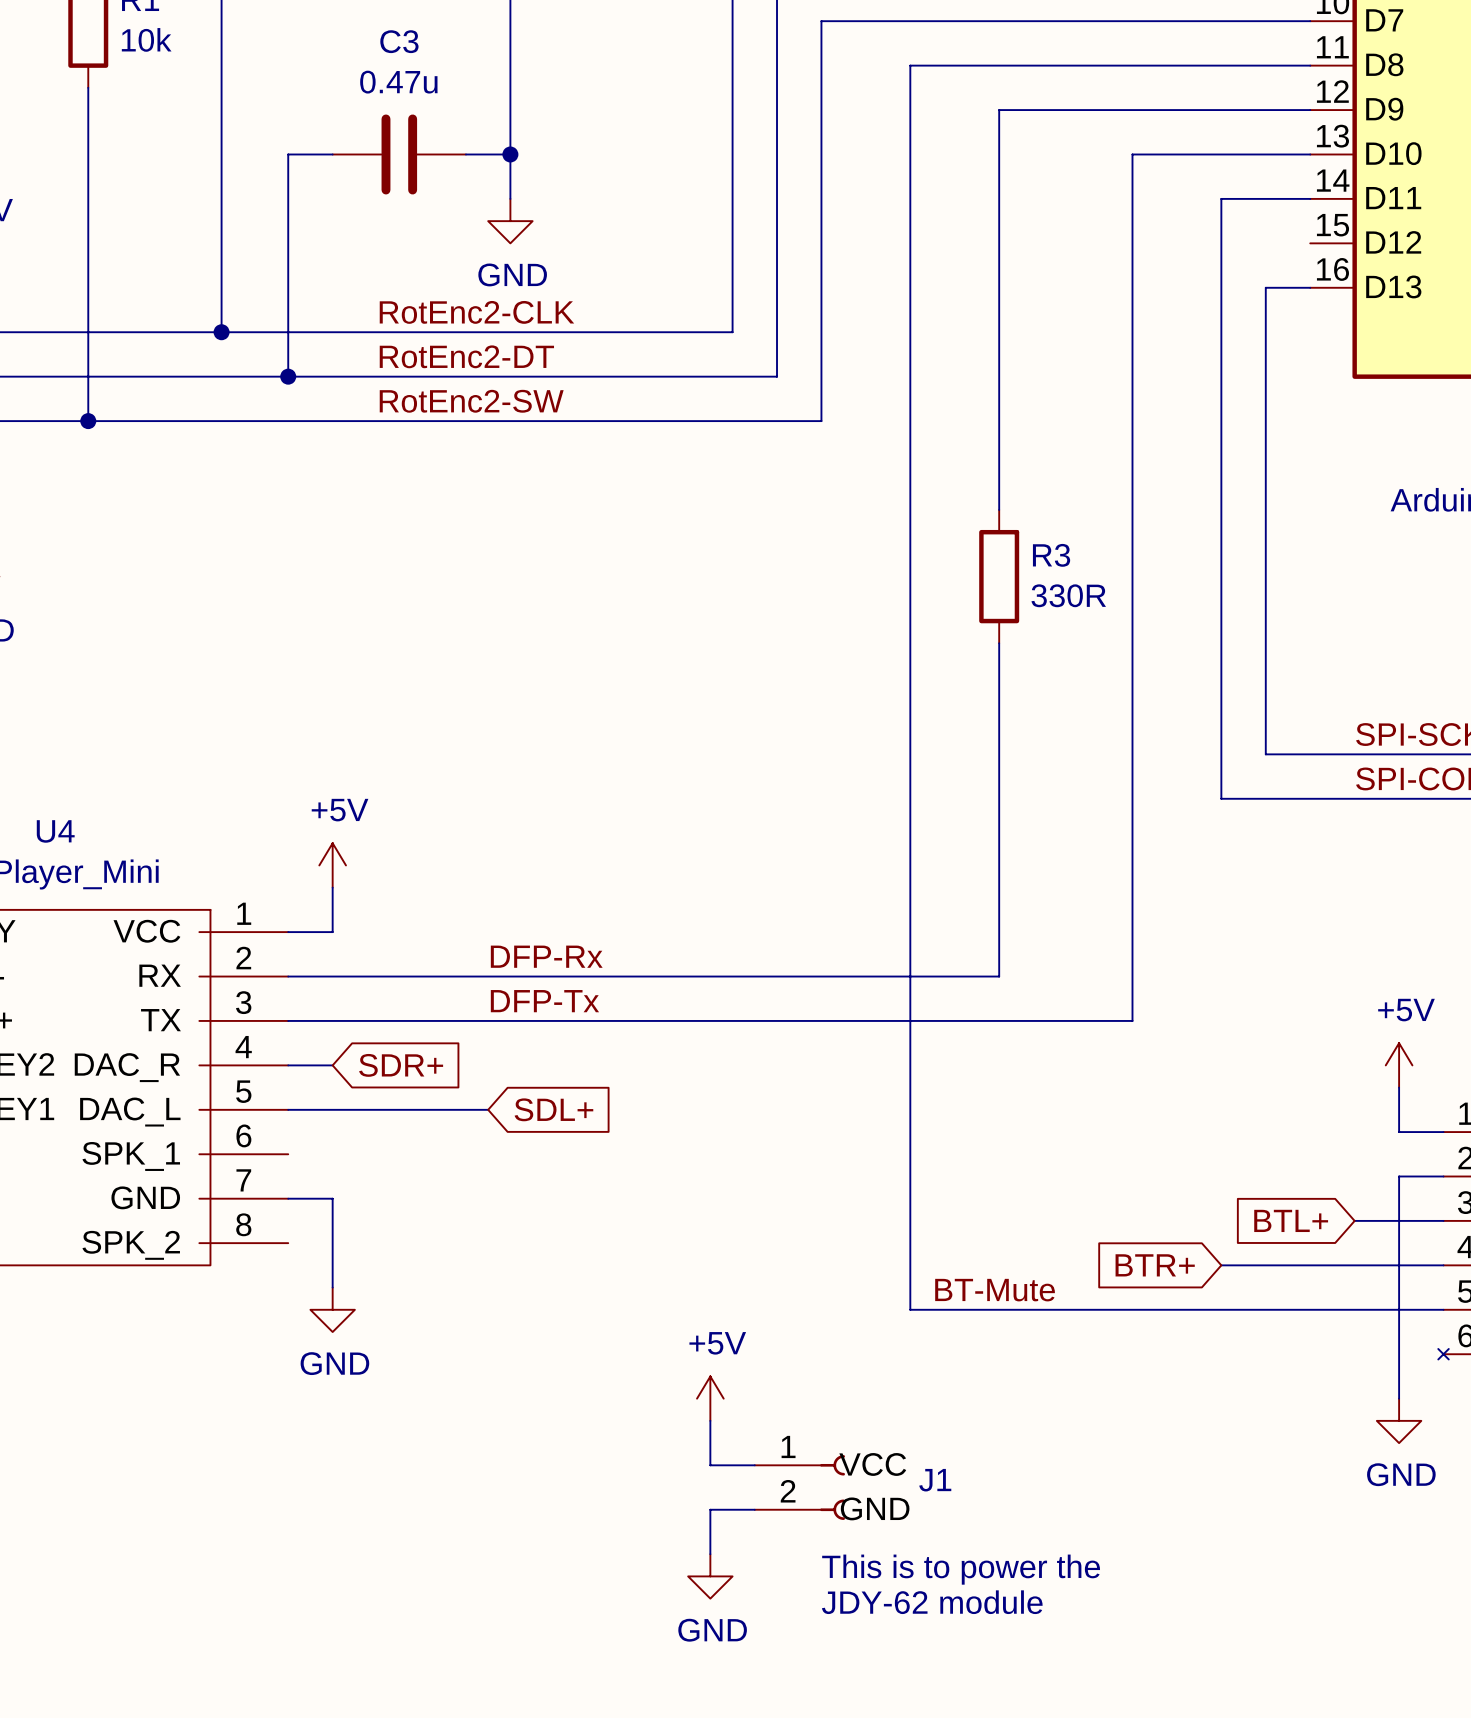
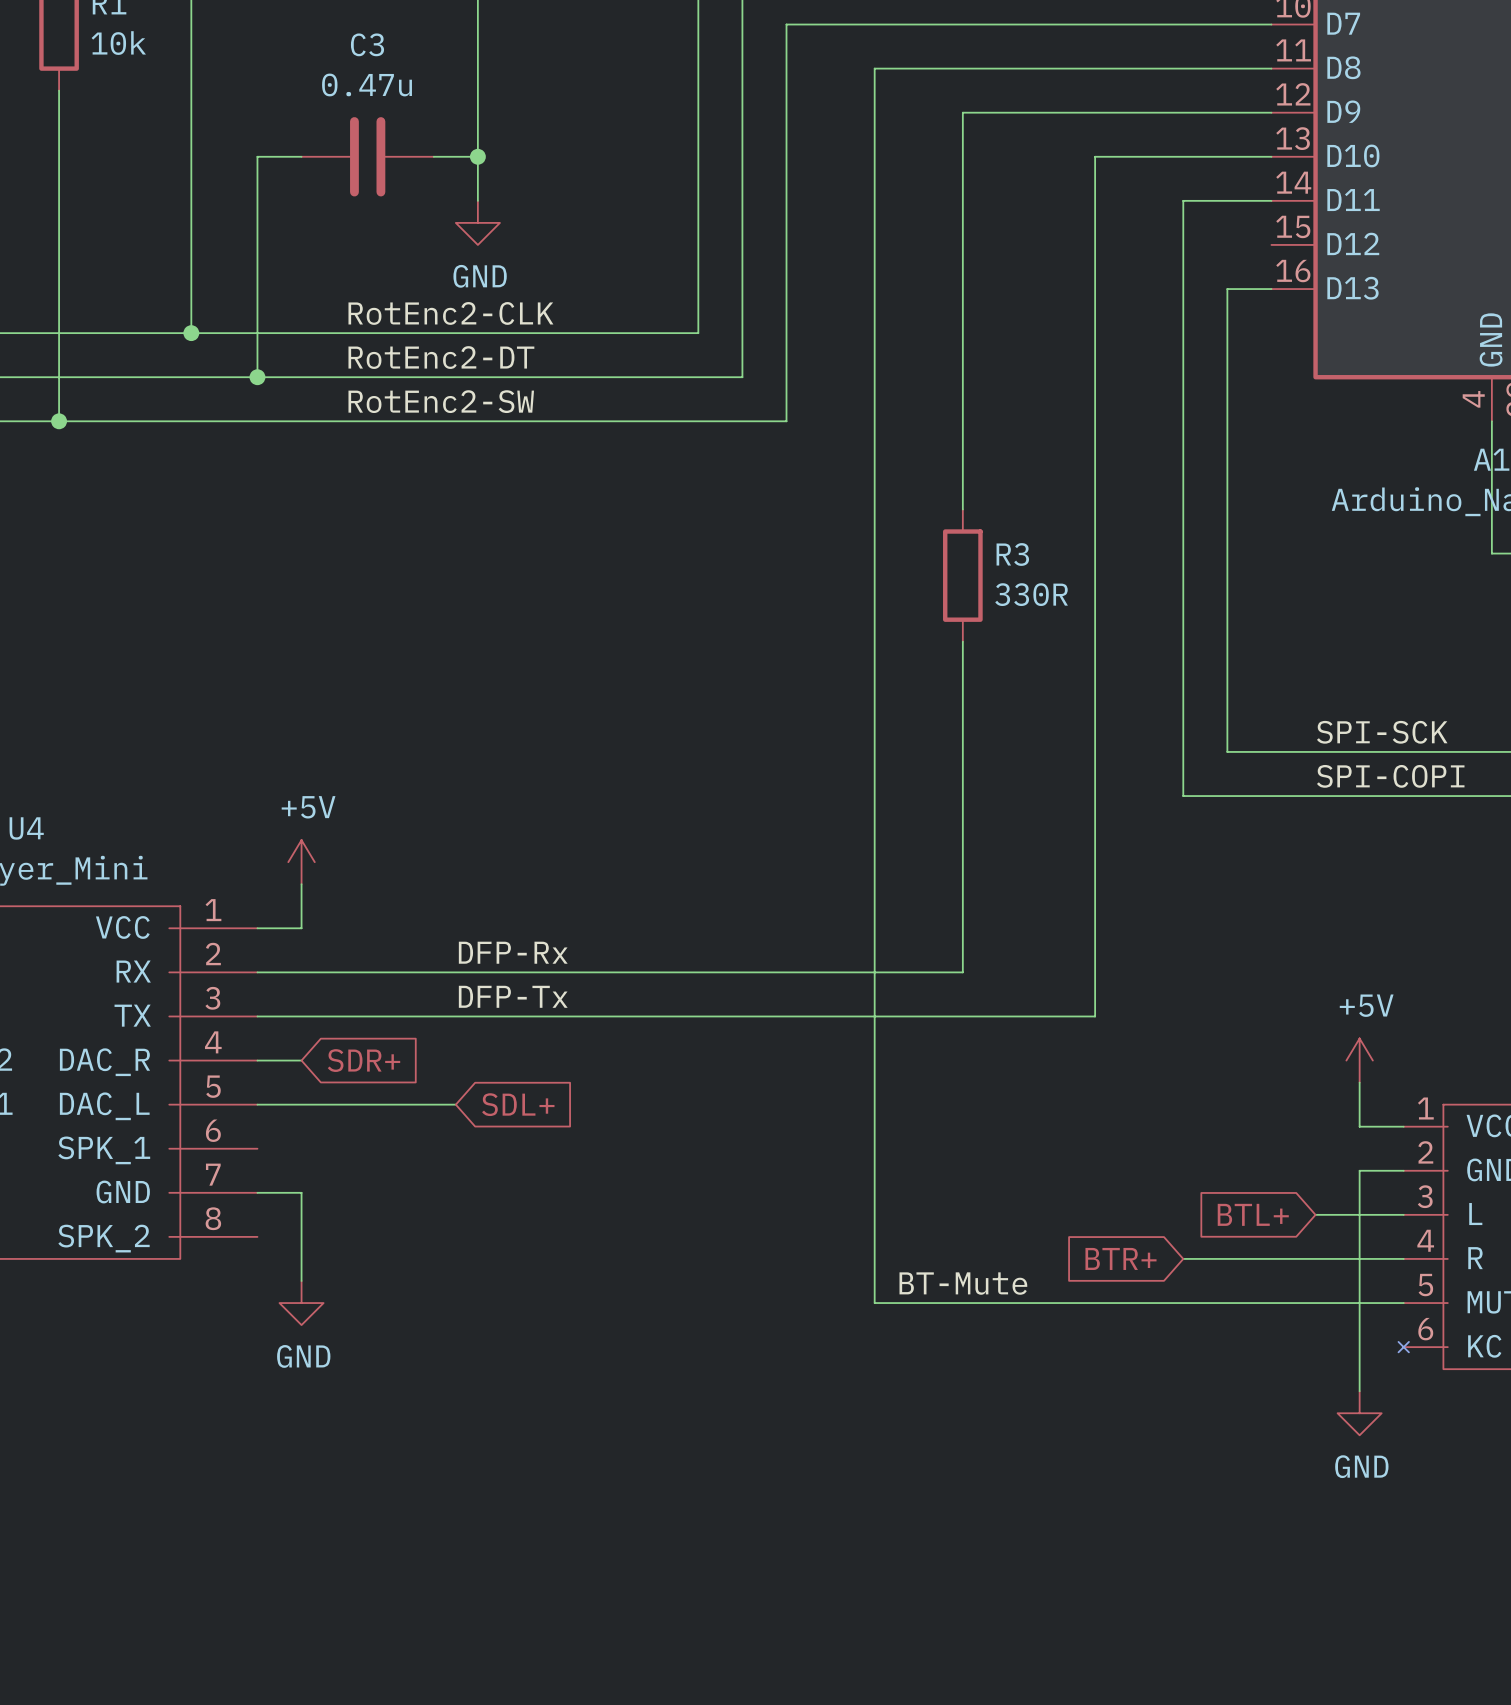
power symbol: +5V (710, 1398) -> none
wire: (710, 1420) (710, 1465) (754, 1465) -> none
J1: (799, 1487) -> none
wire: (754, 1509) (710, 1509) (710, 1554) -> none
text: This is to power the (961, 1569) -> none
power symbol: GND (710, 1576) -> none
text: JDY-62 module (932, 1602) -> none

